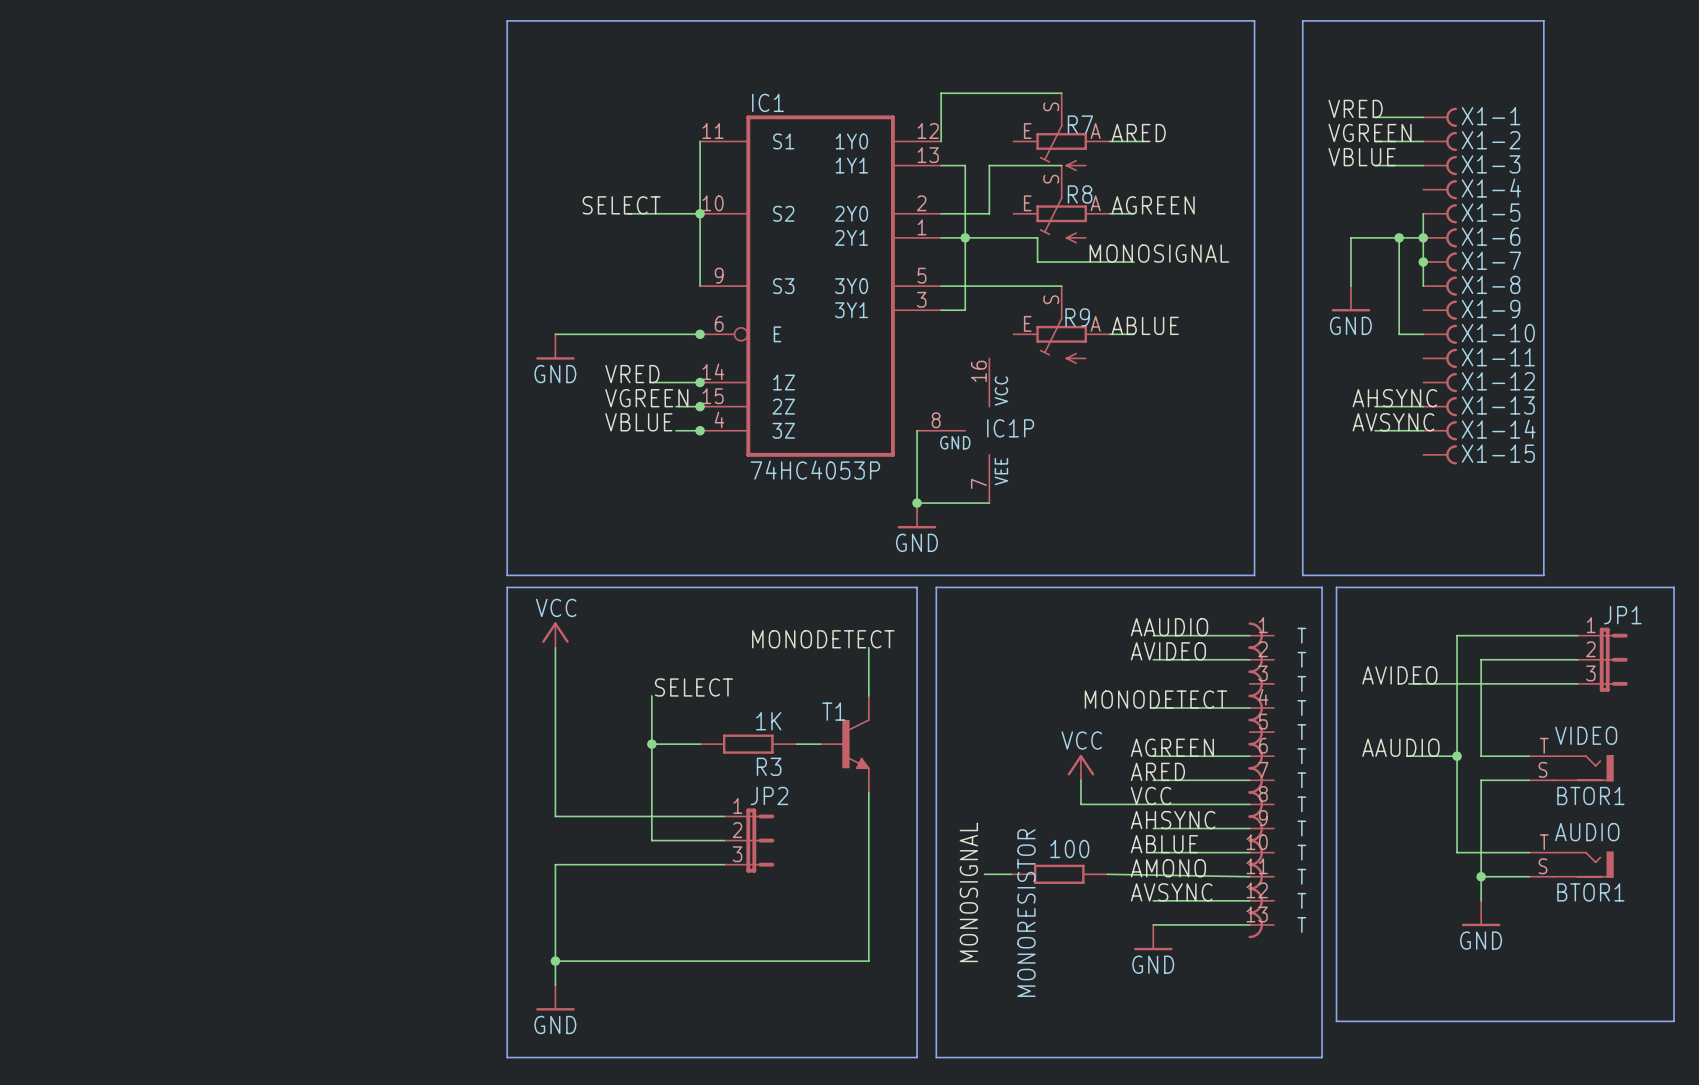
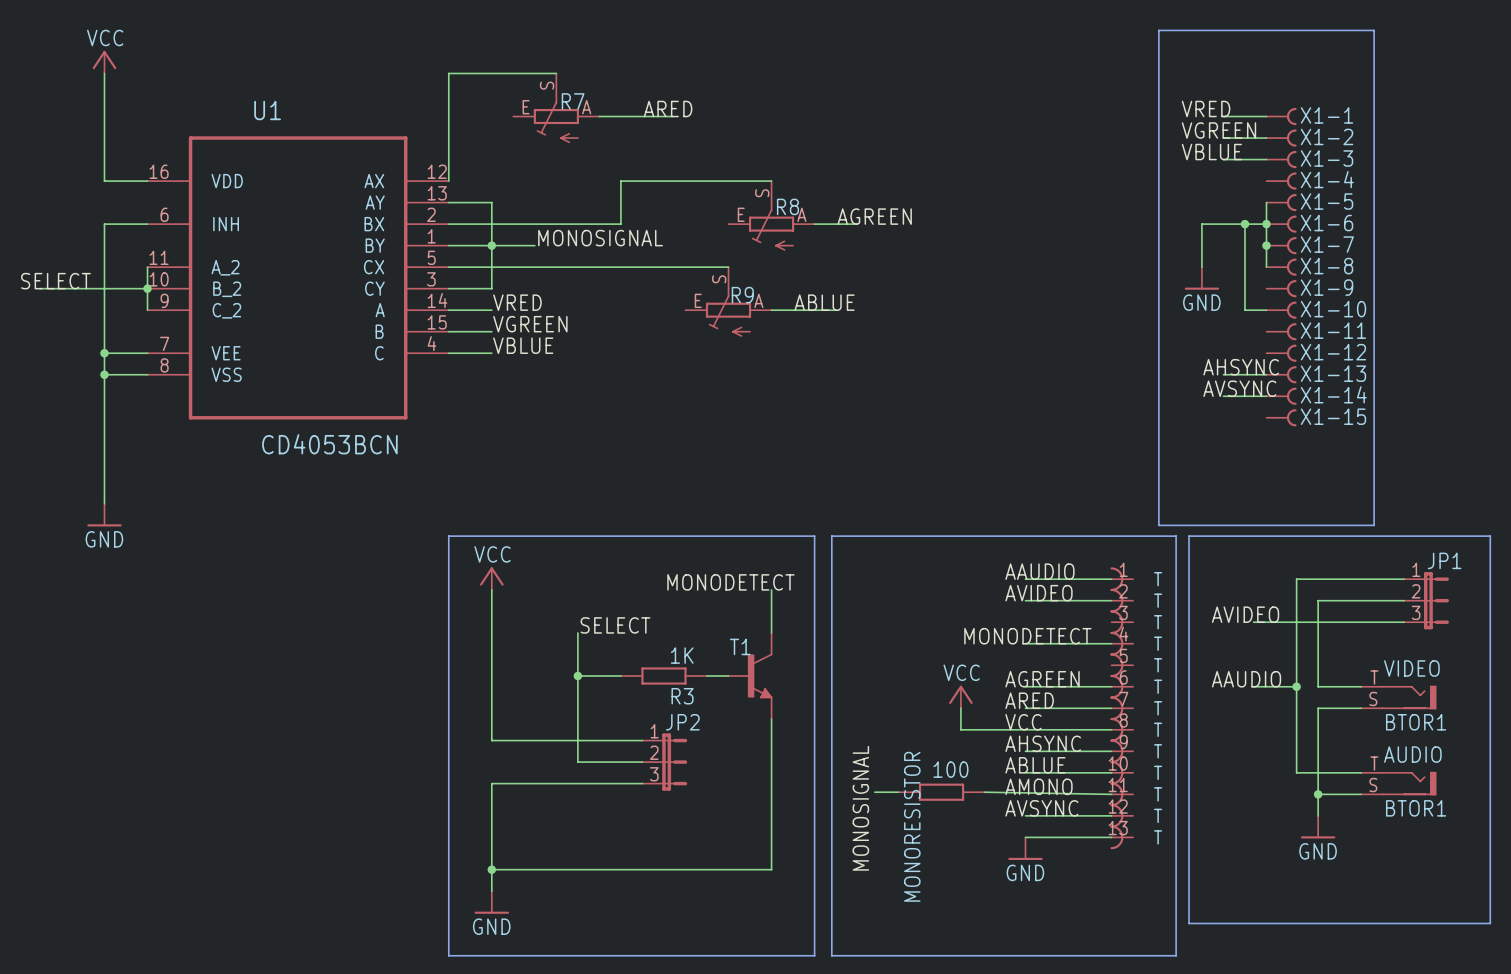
line: (507, 20) (1254, 20) (1254, 575) (507, 575) (507, 20) -> none
power symbol: none -> VCC (104, 62)
wire: none -> (104, 73) (104, 181) (147, 181)
wire: none -> (556, 73) (448, 73) (448, 181)
wire: (1061, 93) (941, 93) (941, 141) -> none
label: none -> ARED (668, 108)
wire: none -> (599, 116) (672, 116)
R7 position: (1061, 132) -> (556, 108)
label: ARED (1138, 133) -> none
wire: (700, 141) (700, 189) -> (771, 181) (620, 181)
wire: (1109, 141) (1143, 141) -> none
wire: (941, 165) (965, 165) (965, 310) (941, 310) -> none
wire: (1061, 165) (989, 165) (989, 213) (941, 213) -> none
R8 position: (1061, 204) -> (771, 215)
label: SELECT (621, 205) -> none
label position: AGREEN (1153, 205) -> AGREEN (874, 216)
wire: none -> (448, 202) (491, 202) (491, 288) (448, 288)
wire: (627, 213) (700, 213) -> none
junction: (700, 213) -> none
wire: none -> (147, 224) (104, 224) (104, 503)
wire: (700, 237) (700, 286) -> (620, 224) (448, 224)
wire: (965, 237) (1037, 237) (1037, 261) (1134, 261) -> none
junction: (965, 237) -> none
label: none -> MONOSIGNAL (600, 238)
label: MONOSIGNAL (1159, 253) -> none
wire: none -> (448, 245) (534, 245)
junction: none -> (491, 245)
wire: none -> (147, 267) (147, 310)
wire: none -> (448, 267) (728, 267)
IC1: 74HC4053P (820, 286) -> none
wire: (941, 286) (1061, 286) -> none
U1: none -> CD4053BCN (298, 277)
label: none -> SELECT (55, 281)
wire: none -> (39, 288) (147, 288)
junction: none -> (147, 288)
R9 position: (1061, 325) -> (728, 301)
label position: ABLUE (1145, 325) -> ABLUE (824, 302)
wire: (555, 334) (700, 334) -> (491, 310) (448, 310)
junction: (700, 334) -> none
wire: none -> (771, 310) (836, 310)
wire: (1109, 334) (1134, 334) -> none
power symbol: GND (555, 346) -> none
wire: none -> (448, 331) (491, 331)
label position: VRED (632, 374) -> VRED (517, 302)
wire: none -> (104, 353) (147, 353)
junction: none -> (104, 353)
wire: (651, 382) (700, 382) -> (448, 353) (491, 353)
junction: (700, 382) -> none
label position: VGREEN (646, 398) -> VGREEN (530, 324)
wire: none -> (104, 374) (147, 374)
junction: none -> (104, 374)
wire: (675, 406) (700, 406) -> none
junction: (700, 406) -> none
label position: VBLUE (638, 422) -> VBLUE (523, 345)
wire: (675, 430) (700, 430) -> none
junction: (700, 430) -> none
wire: (917, 430) (917, 503) (989, 503) -> none
IC1P: (953, 430) -> none
junction: (917, 503) -> none
power symbol: GND (917, 515) -> none
power symbol: none -> GND (104, 515)

